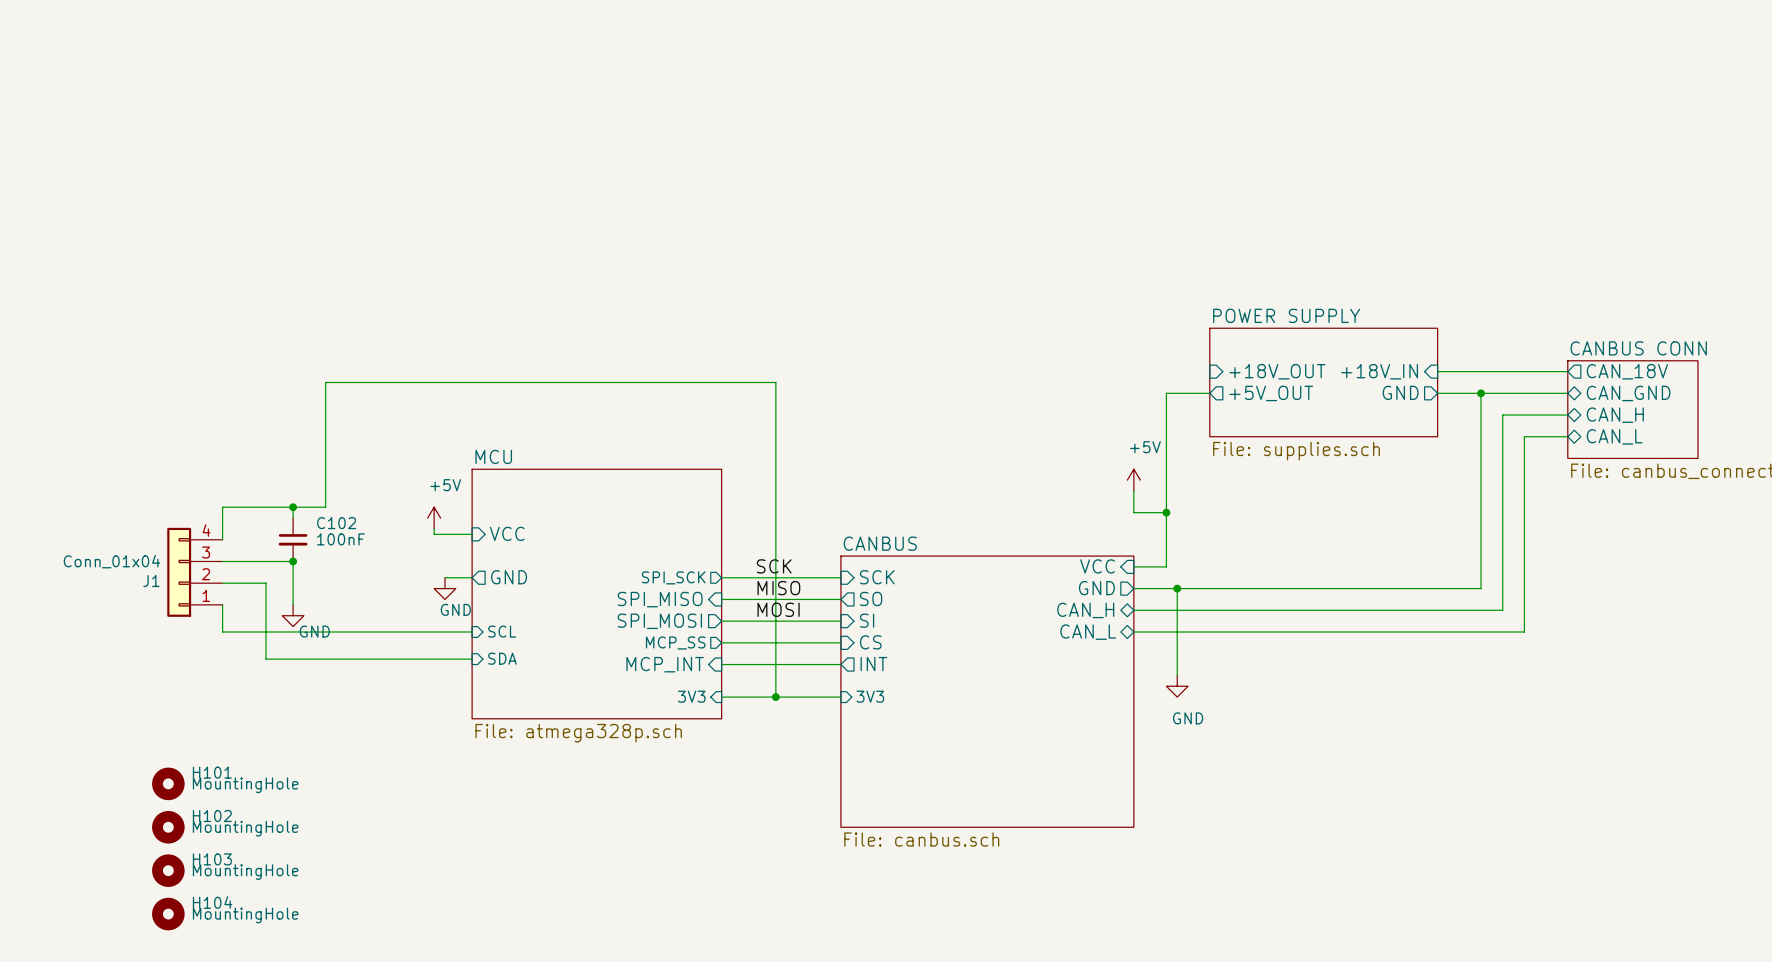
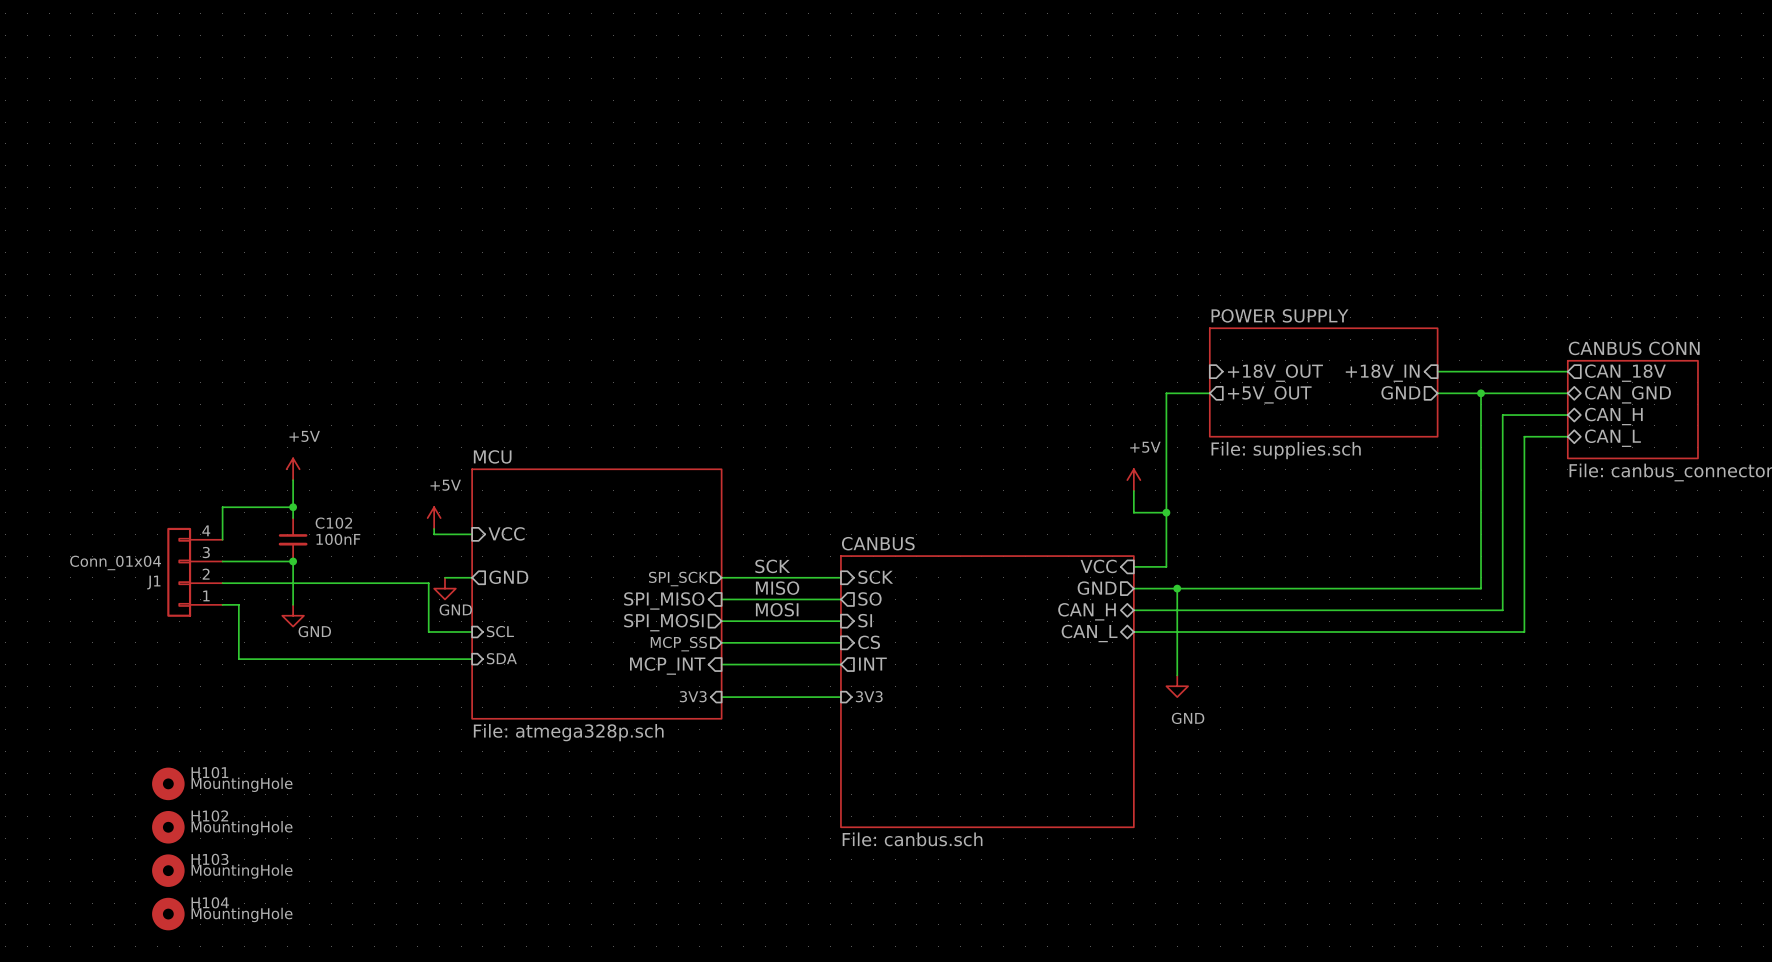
power symbol: none -> +5V (293, 469)
wire: (293, 507) (325, 507) (325, 382) (775, 382) (775, 697) -> (293, 507) (293, 480)
wire: (265, 583) (265, 659) -> (222, 604) (238, 604) (238, 659) (265, 659)
wire: (222, 604) (222, 632) (428, 632) -> (265, 583) (428, 583) (428, 632)
junction: (775, 697) -> none

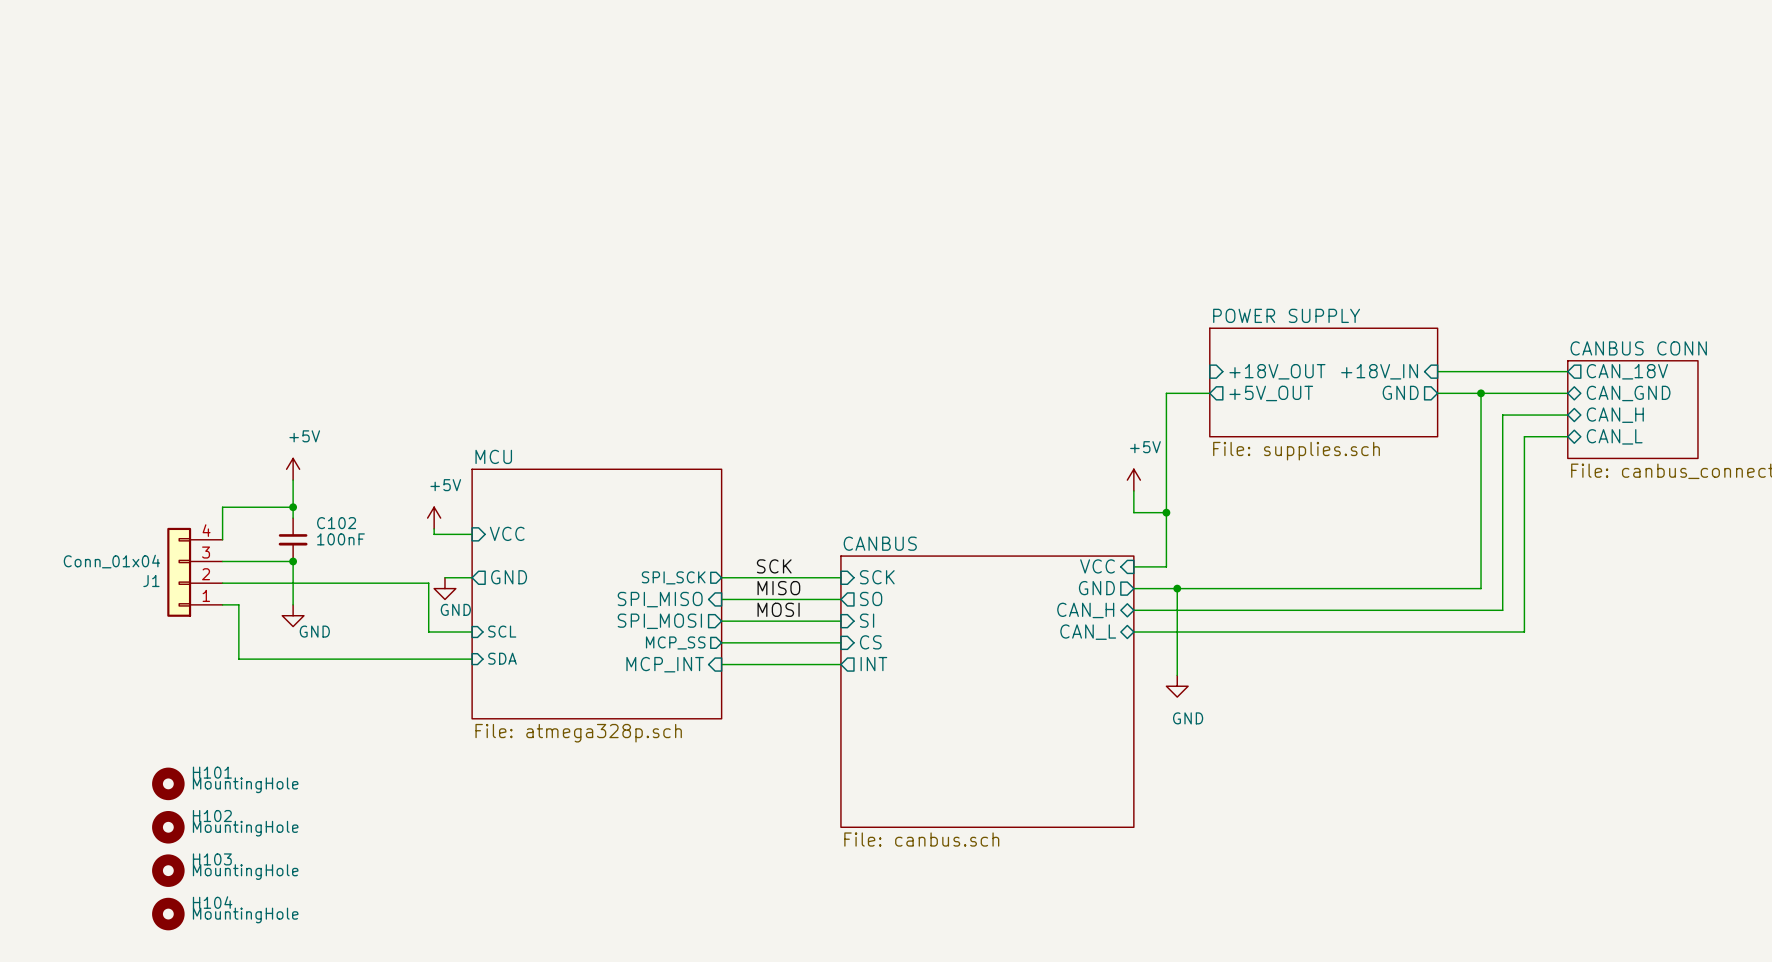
sheet pin: 3V3 (693, 696) -> none
sheet pin: 3V3 (869, 696) -> none
wire: (721, 697) (840, 697) -> none

